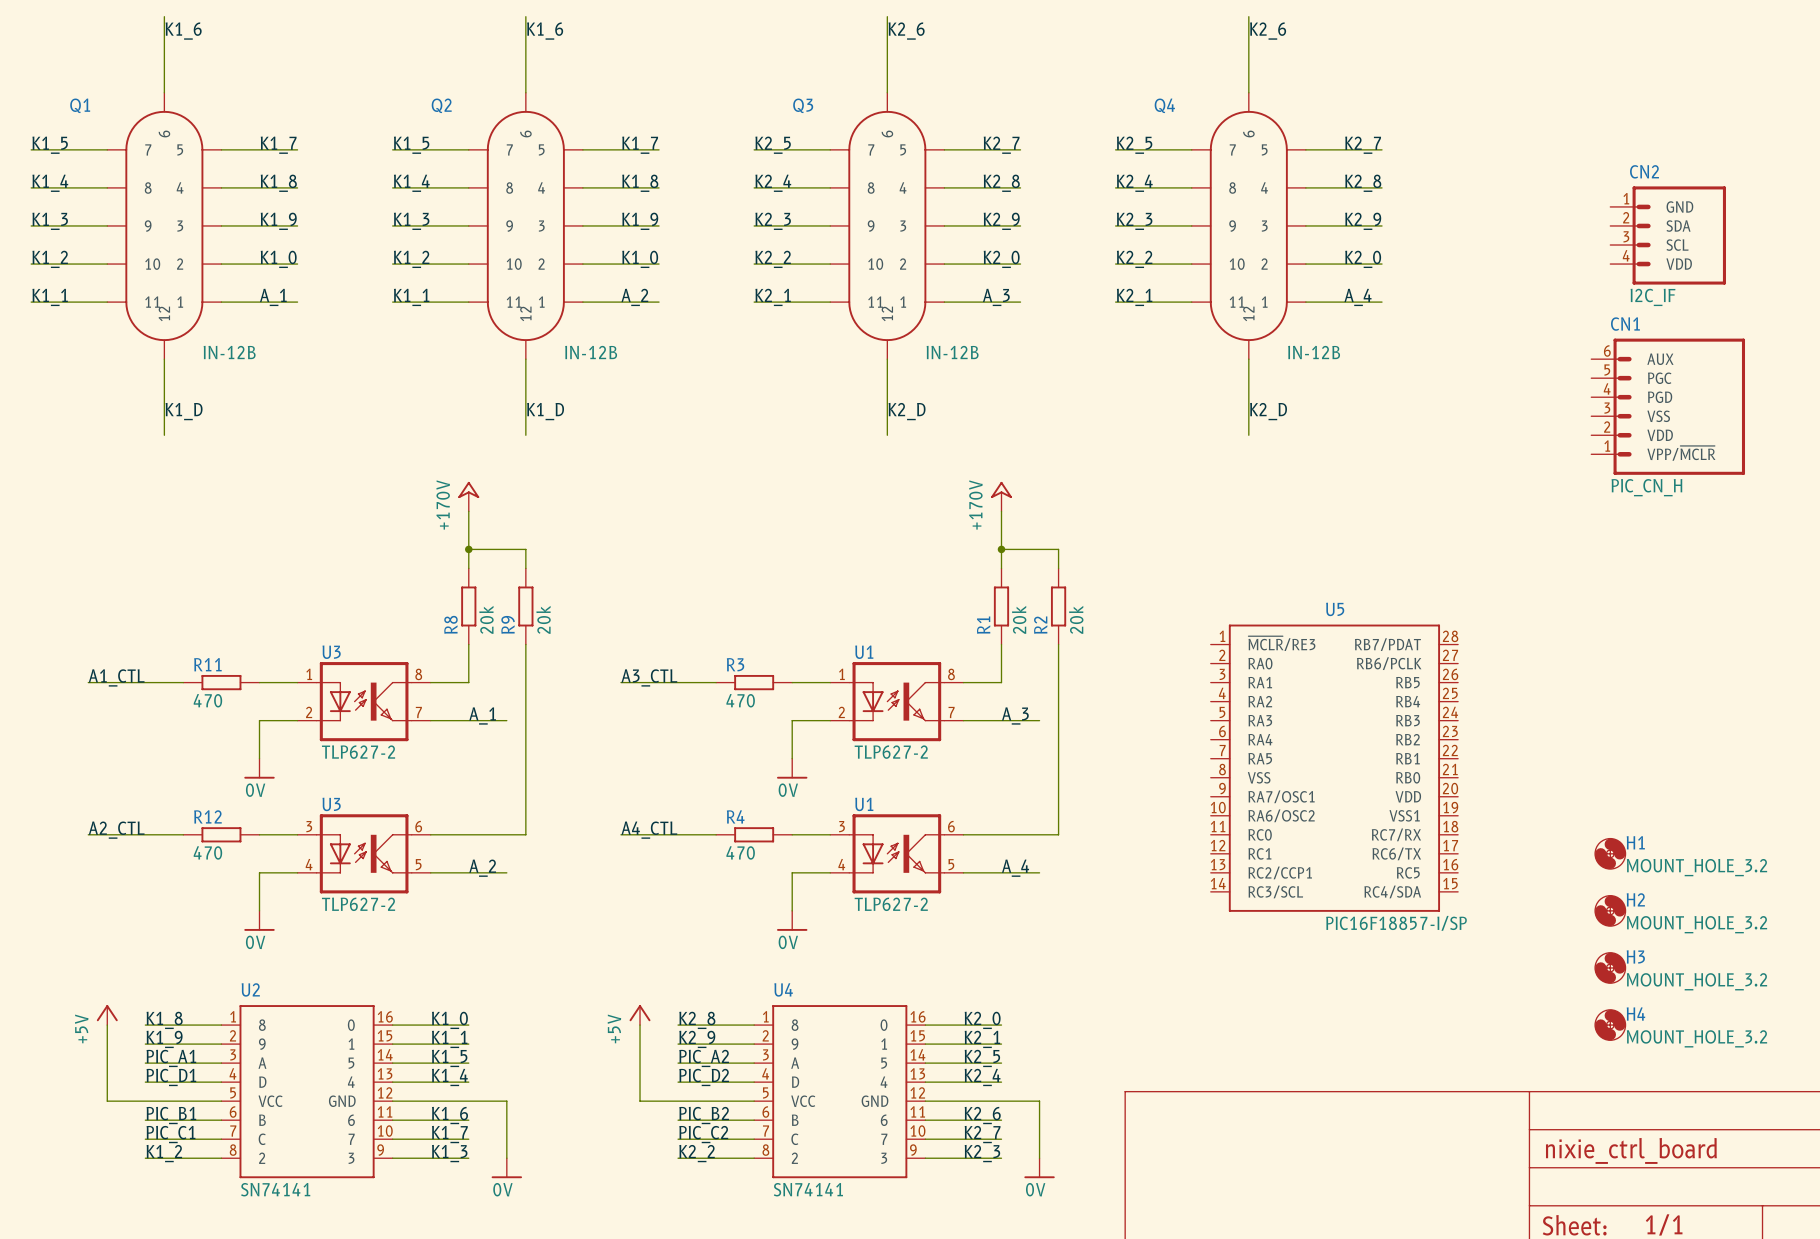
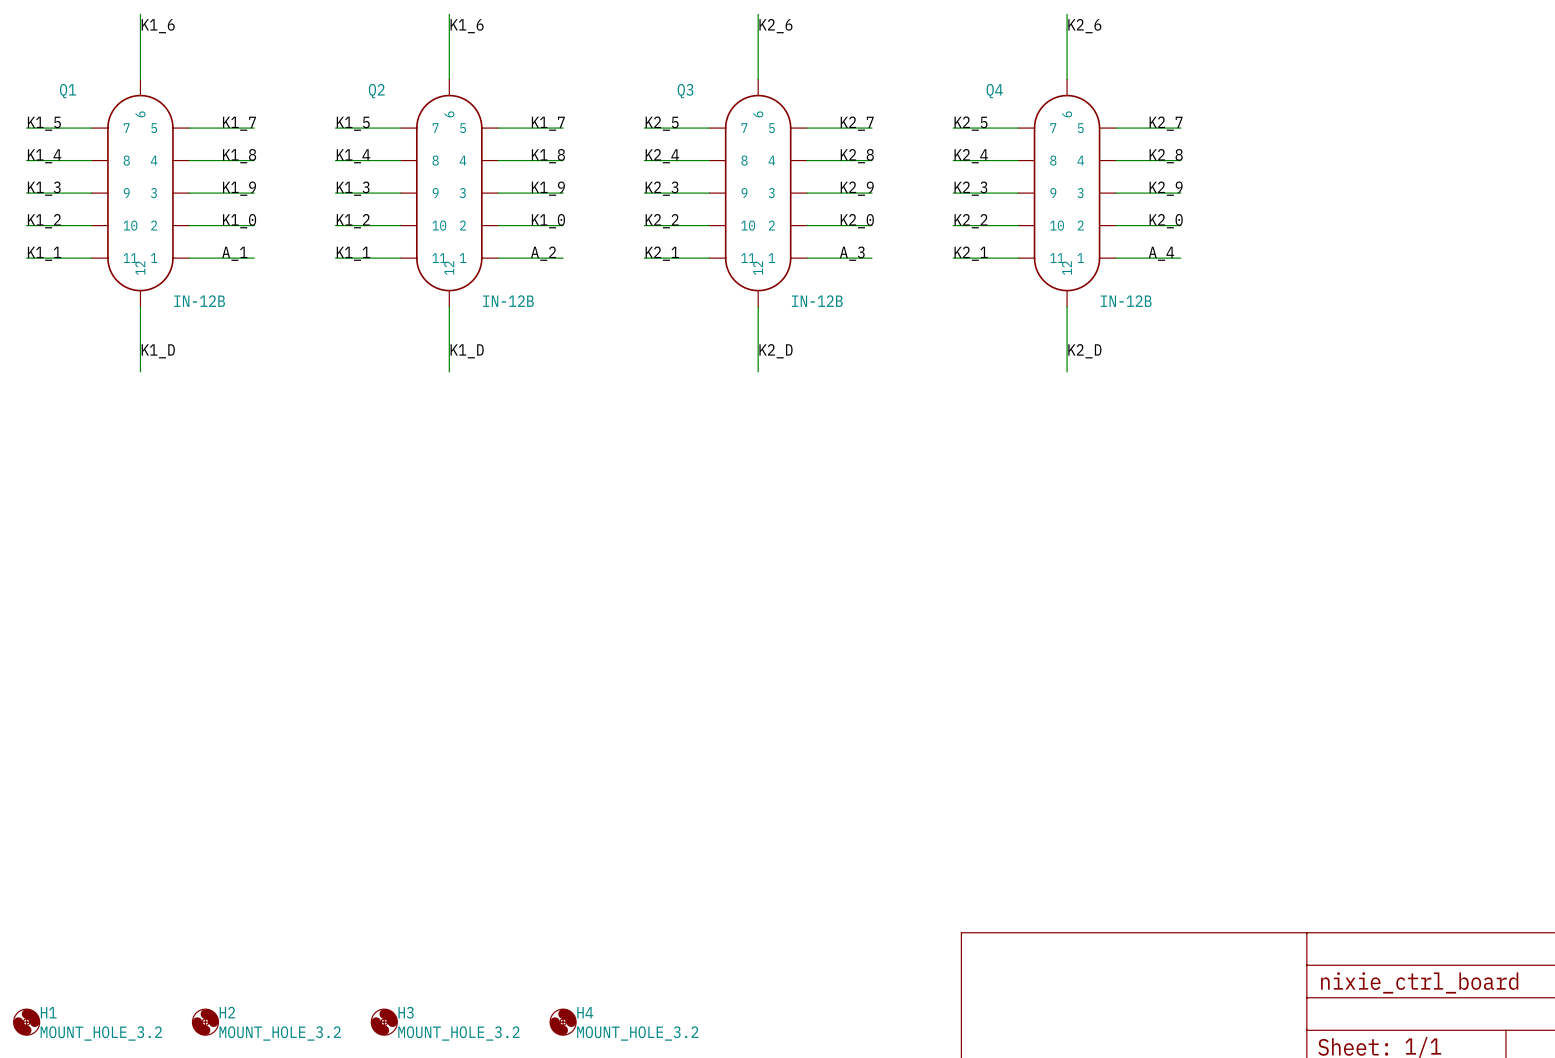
CN2: I2C_IF (1668, 235) -> none
CN1: PIC_CN_H (1668, 406) -> none
power symbol: +170V (468, 496) -> none
power symbol: +170V (1001, 496) -> none
wire: (468, 511) (468, 568) -> none
wire: (1001, 511) (1001, 568) -> none
wire: (468, 549) (525, 549) (525, 568) -> none
junction: (468, 549) -> none
wire: (1001, 549) (1058, 549) (1058, 568) -> none
junction: (1001, 549) -> none
R8: 20k (468, 606) -> none
R9: 20k (525, 606) -> none
R1: 20k (1001, 606) -> none
R2: 20k (1058, 606) -> none
wire: (468, 644) (468, 682) (430, 682) -> none
wire: (525, 644) (525, 834) (430, 834) -> none
wire: (1001, 644) (1001, 682) (963, 682) -> none
wire: (1058, 644) (1058, 834) (963, 834) -> none
label: A1_CTL (116, 677) -> none
label: A3_CTL (649, 677) -> none
wire: (88, 682) (183, 682) -> none
R11: 470 (221, 682) -> none
wire: (259, 682) (297, 682) -> none
wire: (620, 682) (716, 682) -> none
R3: 470 (754, 682) -> none
wire: (792, 682) (830, 682) -> none
U3: TLP627-2 (364, 701) -> none
U1: TLP627-2 (896, 701) -> none
label: A_1 (482, 715) -> none
label: A_3 (1015, 715) -> none
wire: (297, 720) (259, 720) (259, 758) -> none
wire: (430, 720) (506, 720) -> none
wire: (830, 720) (792, 720) (792, 758) -> none
wire: (963, 720) (1039, 720) -> none
power symbol: 0V (259, 768) -> none
power symbol: 0V (792, 768) -> none
U5: PIC16F18857-I/SP (1334, 768) -> none
label: A2_CTL (116, 830) -> none
label: A4_CTL (649, 830) -> none
wire: (88, 834) (183, 834) -> none
R12: 470 (221, 834) -> none
wire: (259, 834) (297, 834) -> none
wire: (620, 834) (716, 834) -> none
R4: 470 (754, 834) -> none
wire: (792, 834) (830, 834) -> none
U3: TLP627-2 (364, 853) -> none
U1: TLP627-2 (896, 853) -> none
H1 position: (1610, 853) -> (26, 1022)
label: A_2 (482, 868) -> none
label: A_4 (1015, 868) -> none
wire: (297, 872) (259, 872) (259, 910) -> none
wire: (430, 872) (506, 872) -> none
wire: (830, 872) (792, 872) (792, 910) -> none
wire: (963, 872) (1039, 872) -> none
H2 position: (1610, 910) -> (205, 1022)
power symbol: 0V (259, 920) -> none
power symbol: 0V (792, 920) -> none
H3 position: (1610, 967) -> (384, 1022)
power symbol: +5V (107, 1015) -> none
power symbol: +5V (640, 1015) -> none
label: K1_8 (164, 1020) -> none
label: K1_0 (449, 1020) -> none
label: K2_8 (697, 1020) -> none
label: K2_0 (982, 1020) -> none
wire: (107, 1025) (107, 1101) (221, 1101) -> none
wire: (145, 1025) (221, 1025) -> none
wire: (392, 1025) (468, 1025) -> none
wire: (640, 1025) (640, 1101) (754, 1101) -> none
wire: (678, 1025) (754, 1025) -> none
wire: (925, 1025) (1001, 1025) -> none
H4 position: (1610, 1025) -> (563, 1022)
label: K1_9 (164, 1039) -> none
label: K1_1 (449, 1039) -> none
label: K2_9 (697, 1039) -> none
label: K2_1 (982, 1039) -> none
wire: (145, 1044) (221, 1044) -> none
wire: (392, 1044) (468, 1044) -> none
wire: (678, 1044) (754, 1044) -> none
wire: (925, 1044) (1001, 1044) -> none
label: PIC_A1 (171, 1058) -> none
label: K1_5 (449, 1058) -> none
label: PIC_A2 (704, 1058) -> none
label: K2_5 (982, 1058) -> none
wire: (145, 1063) (221, 1063) -> none
wire: (392, 1063) (468, 1063) -> none
wire: (678, 1063) (754, 1063) -> none
wire: (925, 1063) (1001, 1063) -> none
label: PIC_D1 (171, 1077) -> none
label: K1_4 (449, 1077) -> none
label: PIC_D2 (704, 1077) -> none
label: K2_4 (982, 1077) -> none
wire: (145, 1082) (221, 1082) -> none
wire: (392, 1082) (468, 1082) -> none
wire: (678, 1082) (754, 1082) -> none
wire: (925, 1082) (1001, 1082) -> none
U2: SN74141 (307, 1091) -> none
U4: SN74141 (839, 1091) -> none
wire: (392, 1101) (506, 1101) (506, 1158) -> none
wire: (925, 1101) (1039, 1101) (1039, 1158) -> none
label: PIC_B1 (171, 1115) -> none
label: K1_6 (449, 1115) -> none
label: PIC_B2 (704, 1115) -> none
label: K2_6 (982, 1115) -> none
wire: (145, 1120) (221, 1120) -> none
wire: (392, 1120) (468, 1120) -> none
wire: (678, 1120) (754, 1120) -> none
wire: (925, 1120) (1001, 1120) -> none
label: PIC_C1 (170, 1134) -> none
label: K1_7 (449, 1134) -> none
label: PIC_C2 (703, 1134) -> none
label: K2_7 (982, 1134) -> none
wire: (145, 1139) (221, 1139) -> none
wire: (392, 1139) (468, 1139) -> none
wire: (678, 1139) (754, 1139) -> none
wire: (925, 1139) (1001, 1139) -> none
label: K1_2 (164, 1153) -> none
label: K1_3 (449, 1153) -> none
label: K2_2 (697, 1153) -> none
label: K2_3 (982, 1153) -> none
wire: (145, 1158) (221, 1158) -> none
wire: (392, 1158) (468, 1158) -> none
wire: (678, 1158) (754, 1158) -> none
wire: (925, 1158) (1001, 1158) -> none
power symbol: 0V (506, 1168) -> none
power symbol: 0V (1039, 1168) -> none

